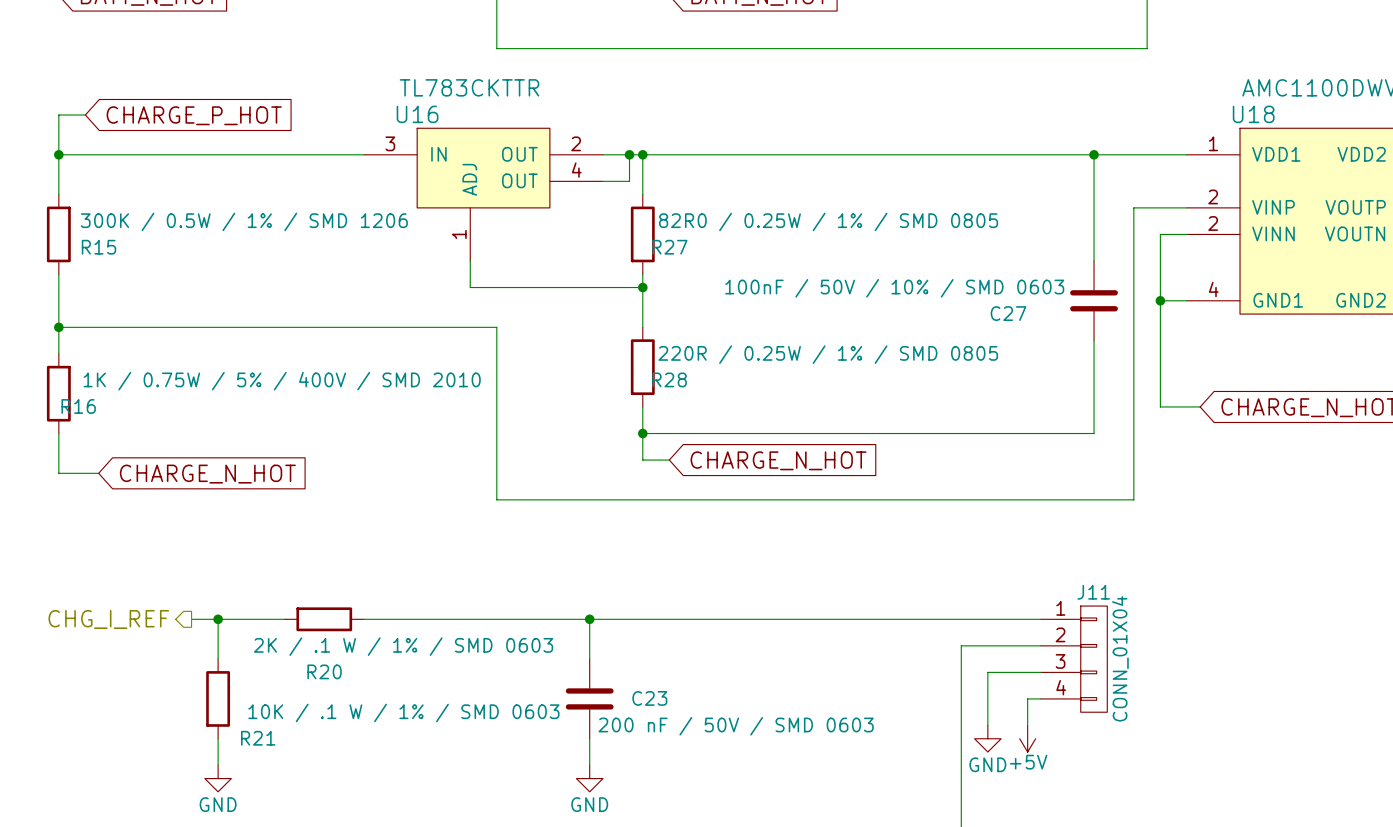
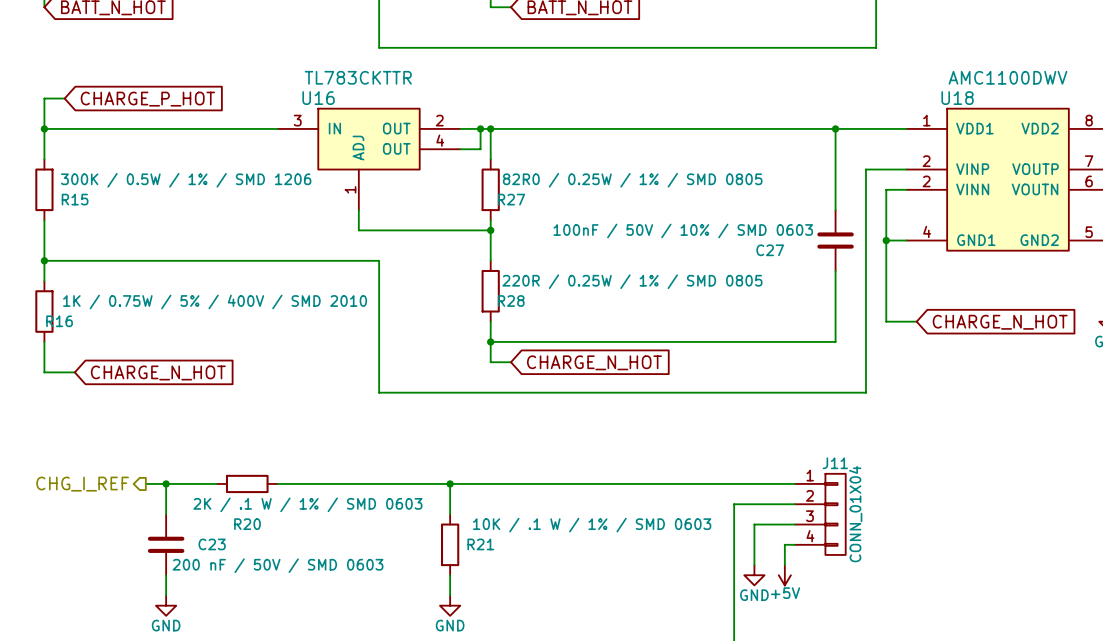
R21 position: (218, 698) -> (450, 544)
C23 position: (589, 698) -> (166, 544)
R21 value position: 10K / .1 W / 1% / SMD 0603 (403, 712) -> 10K / .1 W / 1% / SMD 0603 (592, 525)
R21 name position: R21 (258, 738) -> R21 (480, 544)

